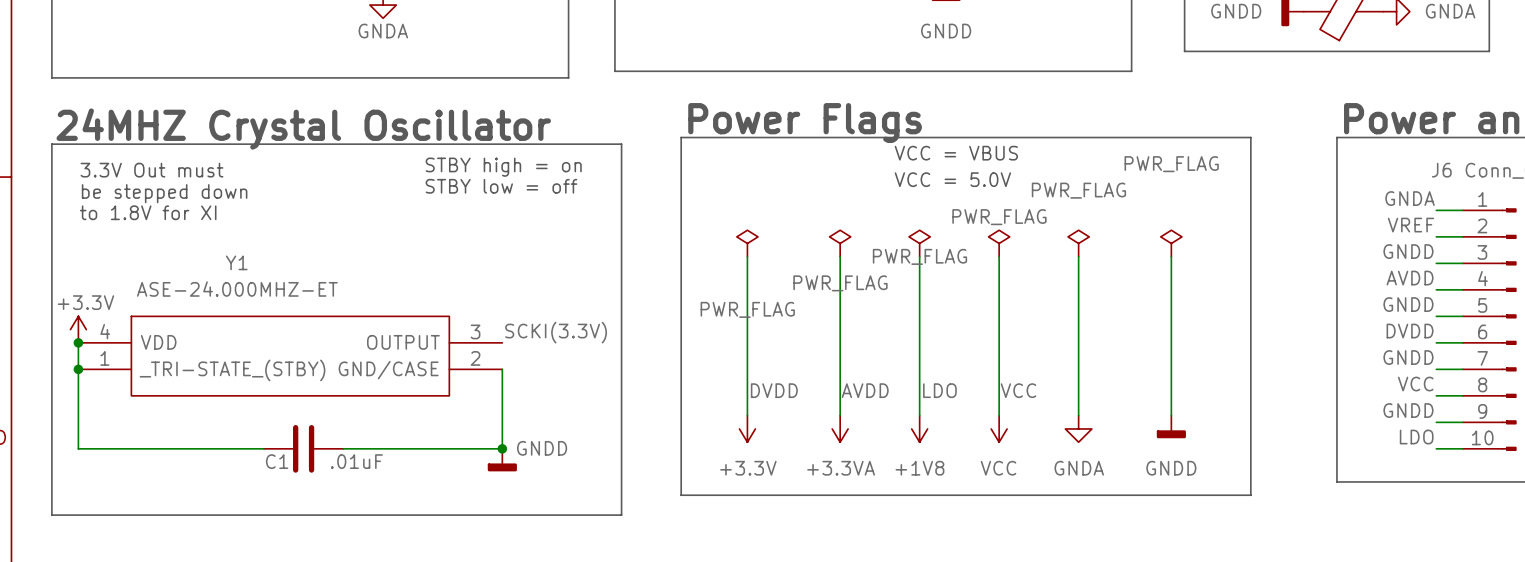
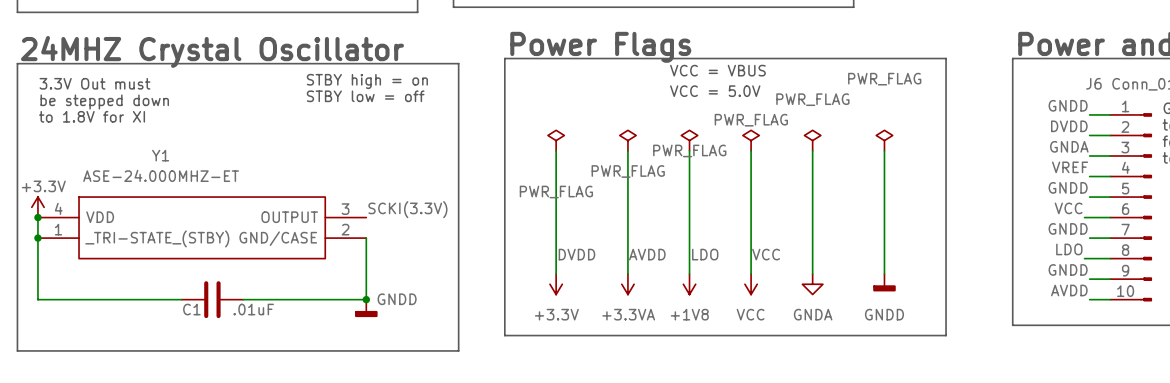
label: GNDA (1410, 198) -> GNDD (1068, 105)
label: VREF (1410, 225) -> DVDD (1069, 126)
label: GNDD (1408, 251) -> GNDA (1069, 146)
label: AVDD (1410, 278) -> VREF (1070, 167)
label: DVDD (1410, 331) -> VCC (1068, 208)
wire: none -> (1084, 217) (1089, 217)
label: VCC (1415, 384) -> LDO (1069, 249)
wire: none -> (1084, 258) (1089, 258)
label: LDO (1416, 437) -> AVDD (1069, 290)

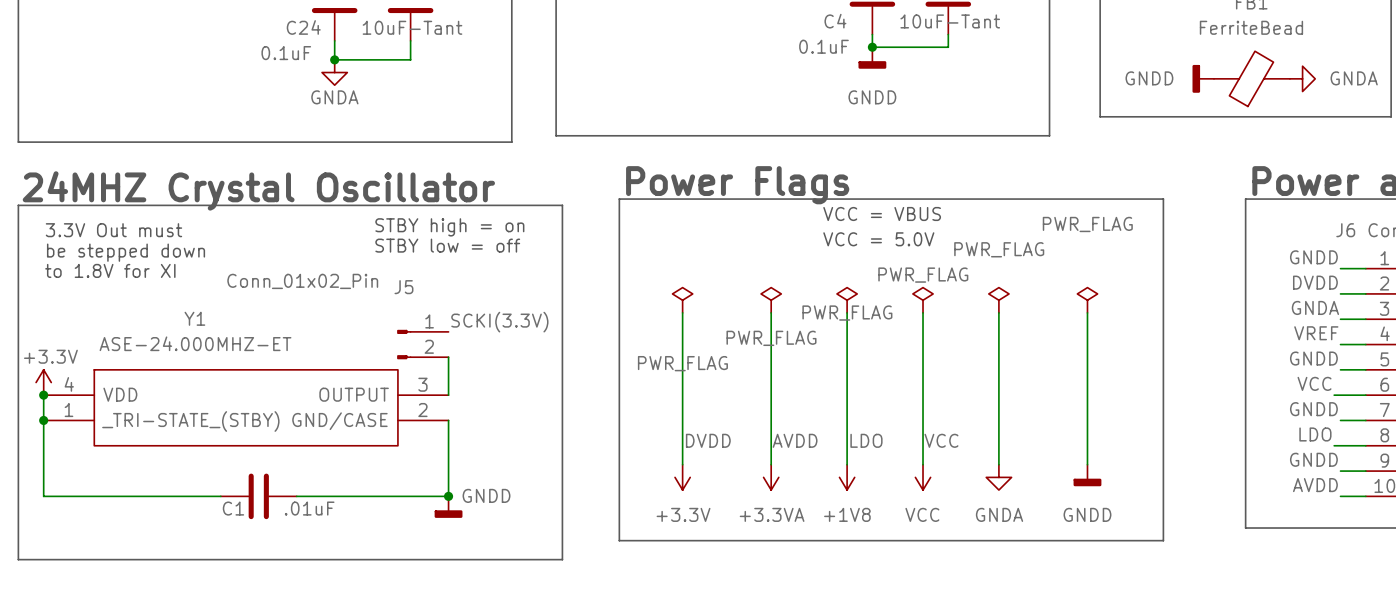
J5: none -> Conn_01x02_Pin (422, 344)
wire: none -> (448, 357) (448, 395)
label position: SCKI(3.3V) (407, 209) -> SCKI(3.3V) (499, 322)

